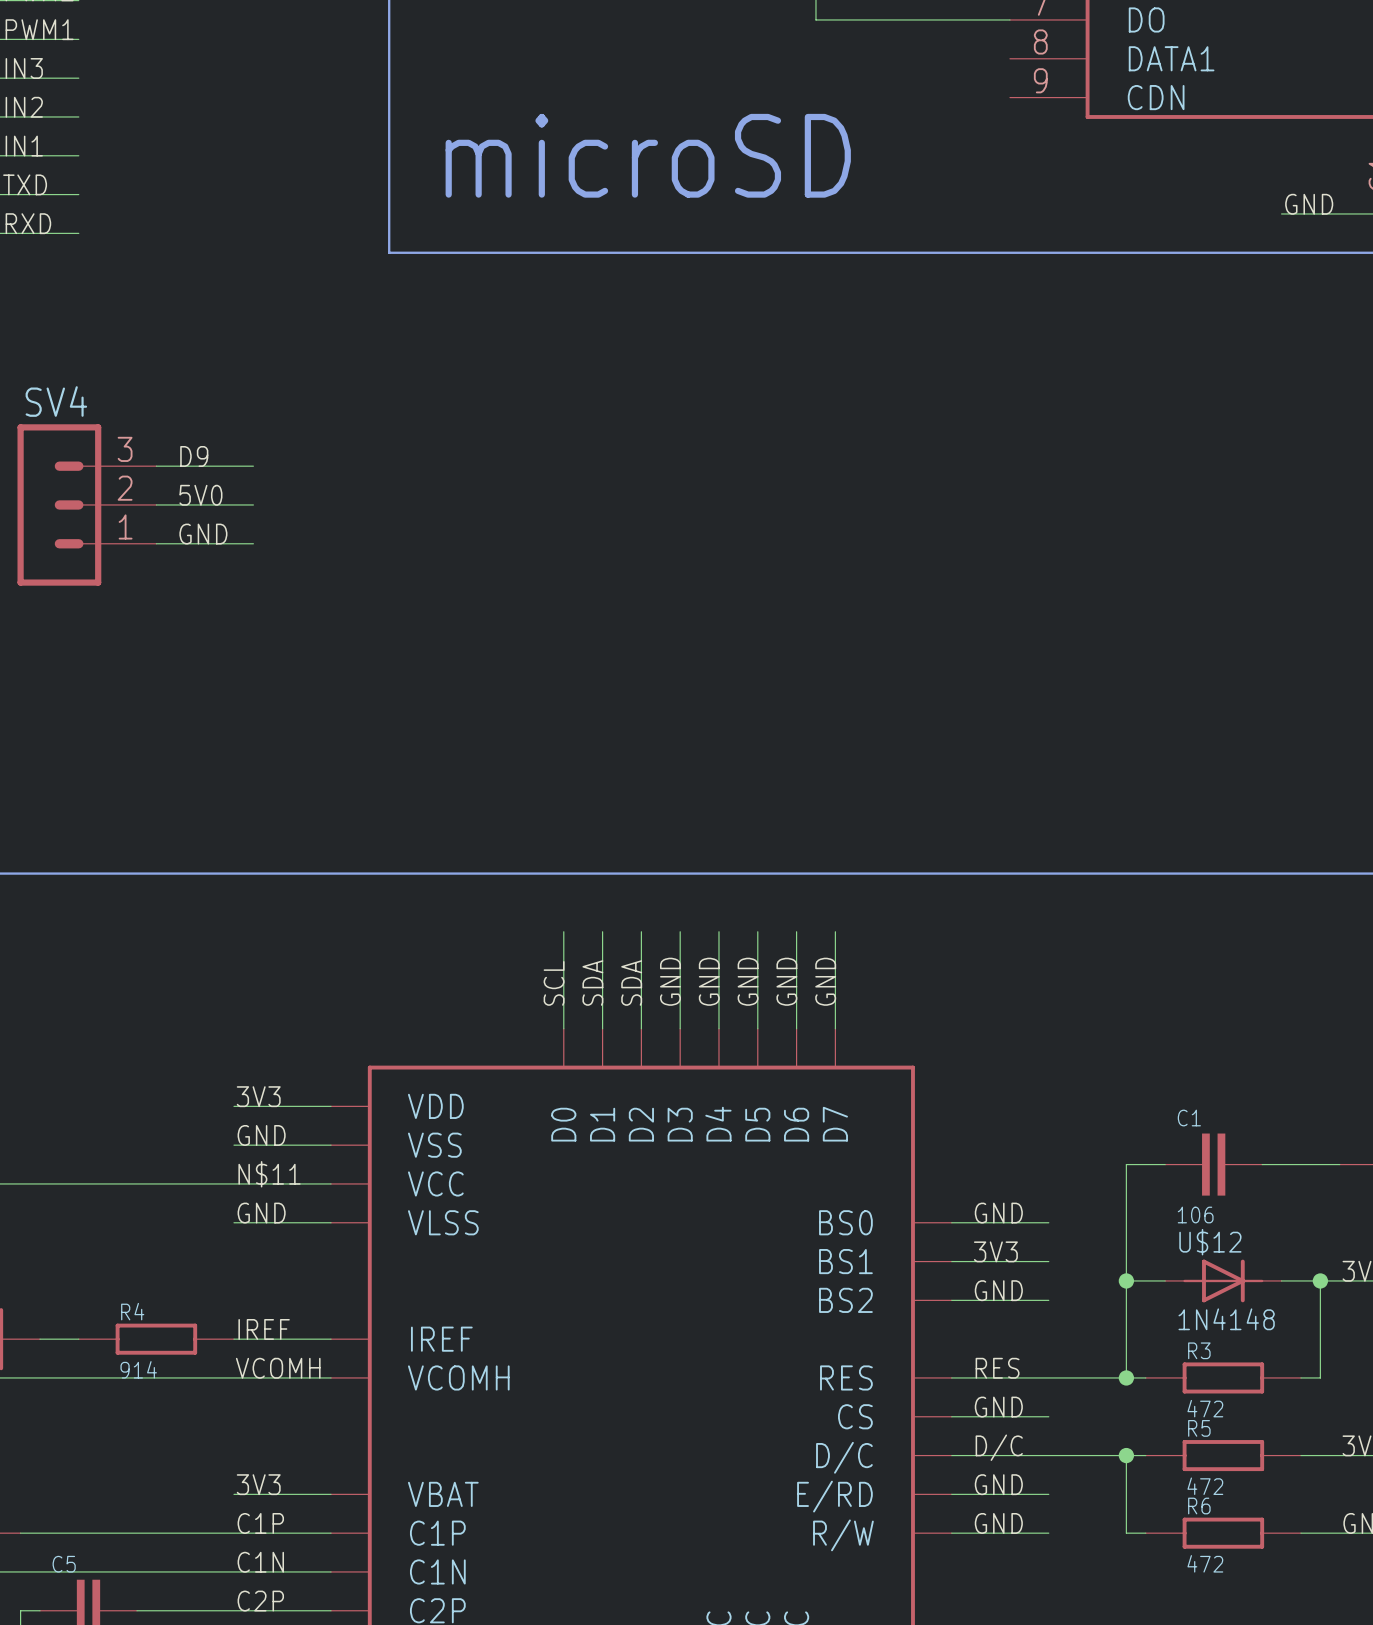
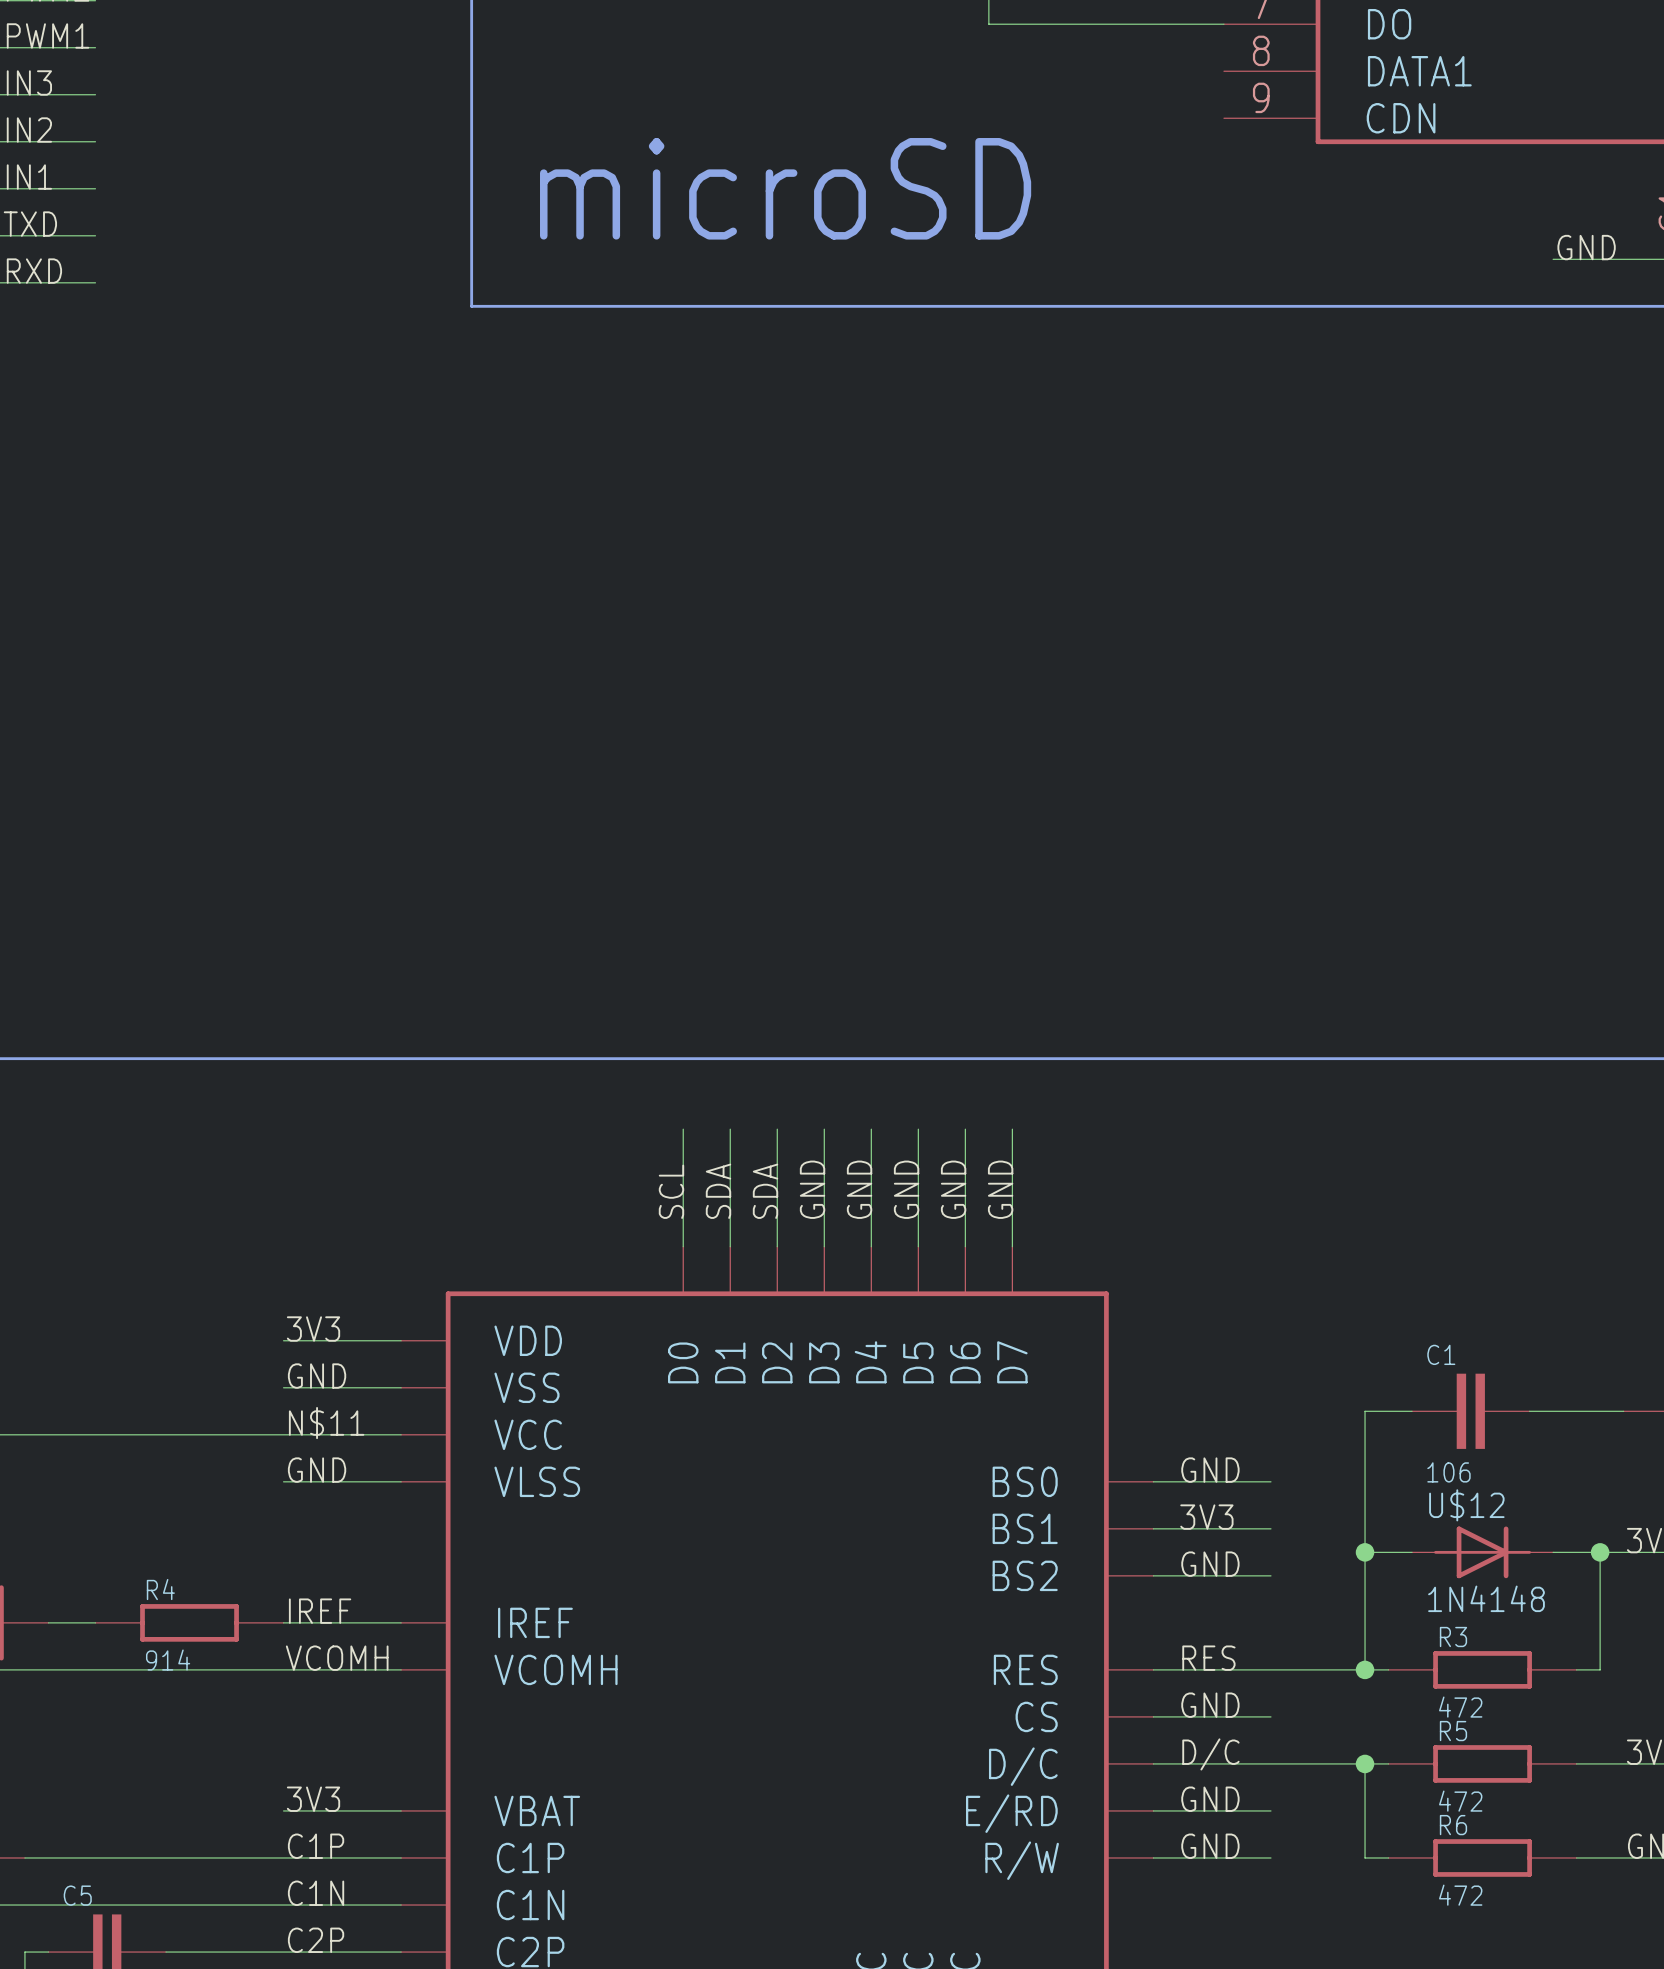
label: D9 (194, 456) -> none
wire: (156, 466) (253, 466) -> none
label: 5V0 (200, 495) -> none
SV4: (86, 504) -> none
wire: (156, 504) (253, 504) -> none
label: GND (203, 534) -> none
wire: (156, 543) (253, 543) -> none

